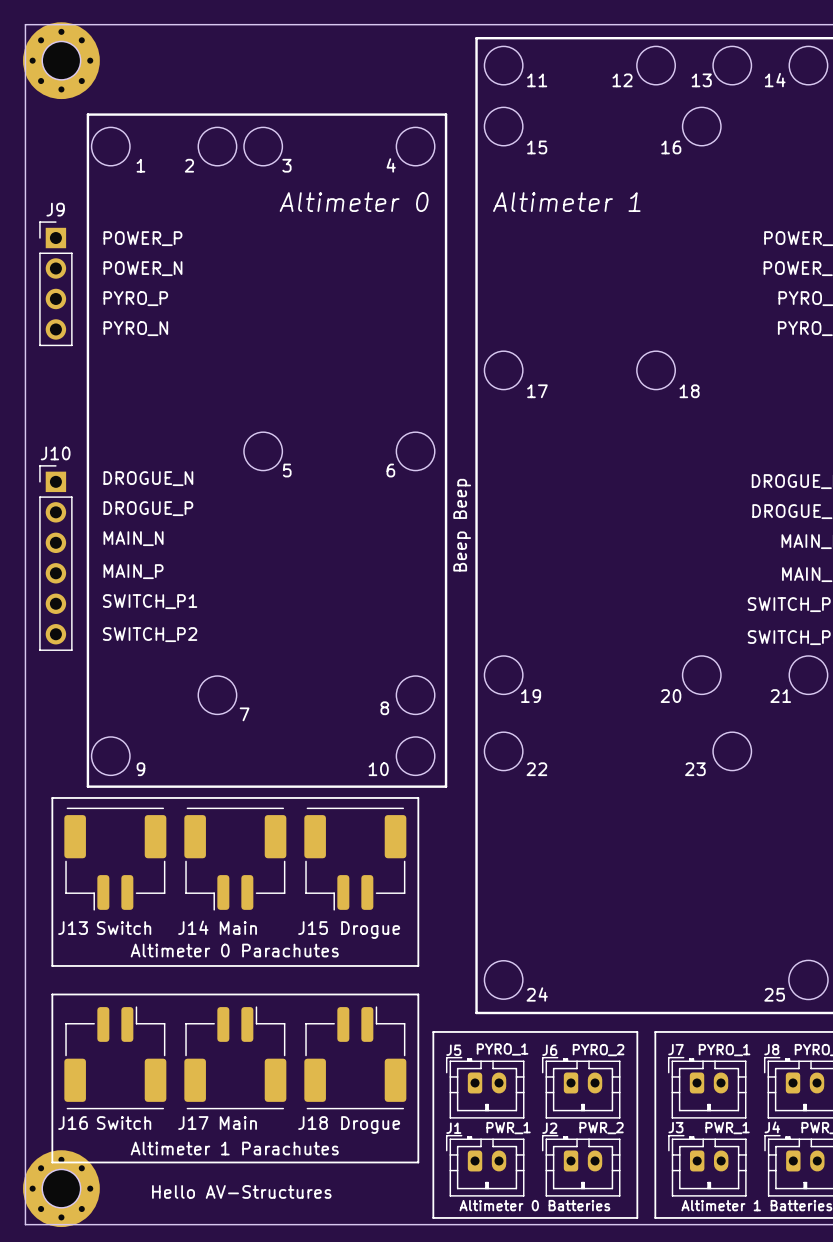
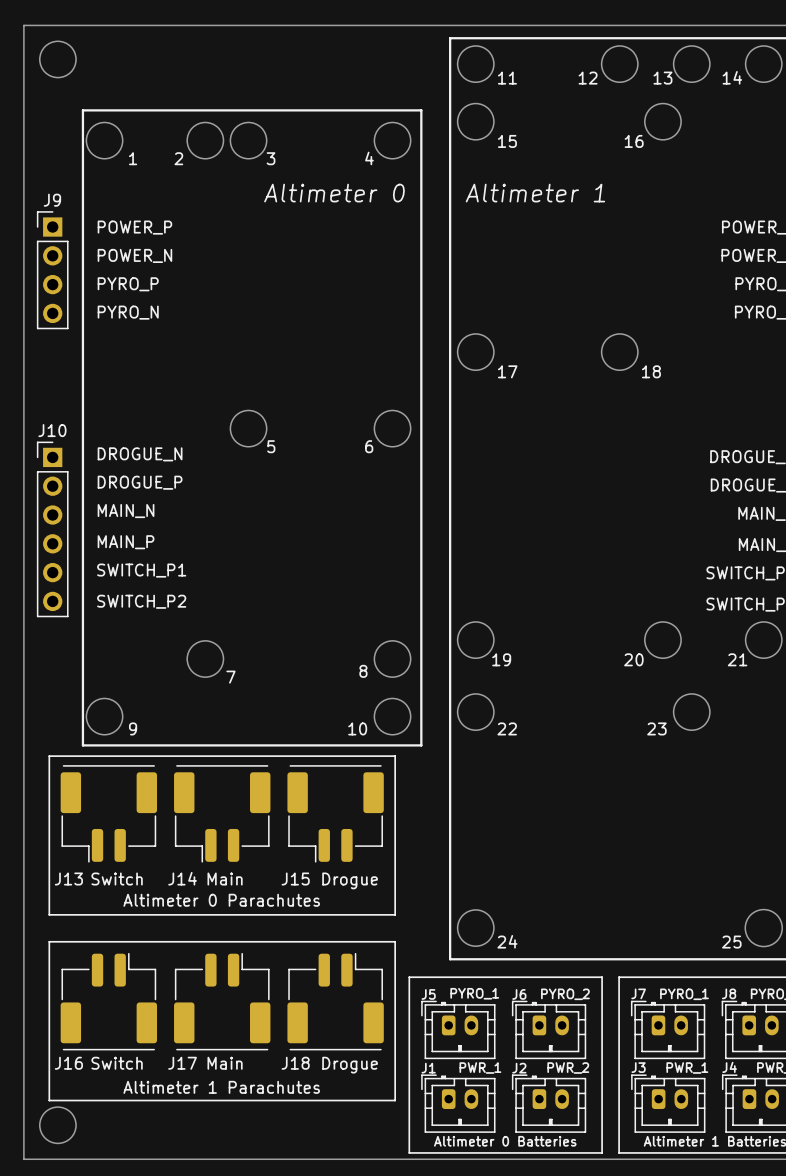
part: (61, 60) -> none
text: Beep Beep (462, 525) -> none
part: (61, 1188) -> none
text: Hello AV-Structures (241, 1191) -> none

